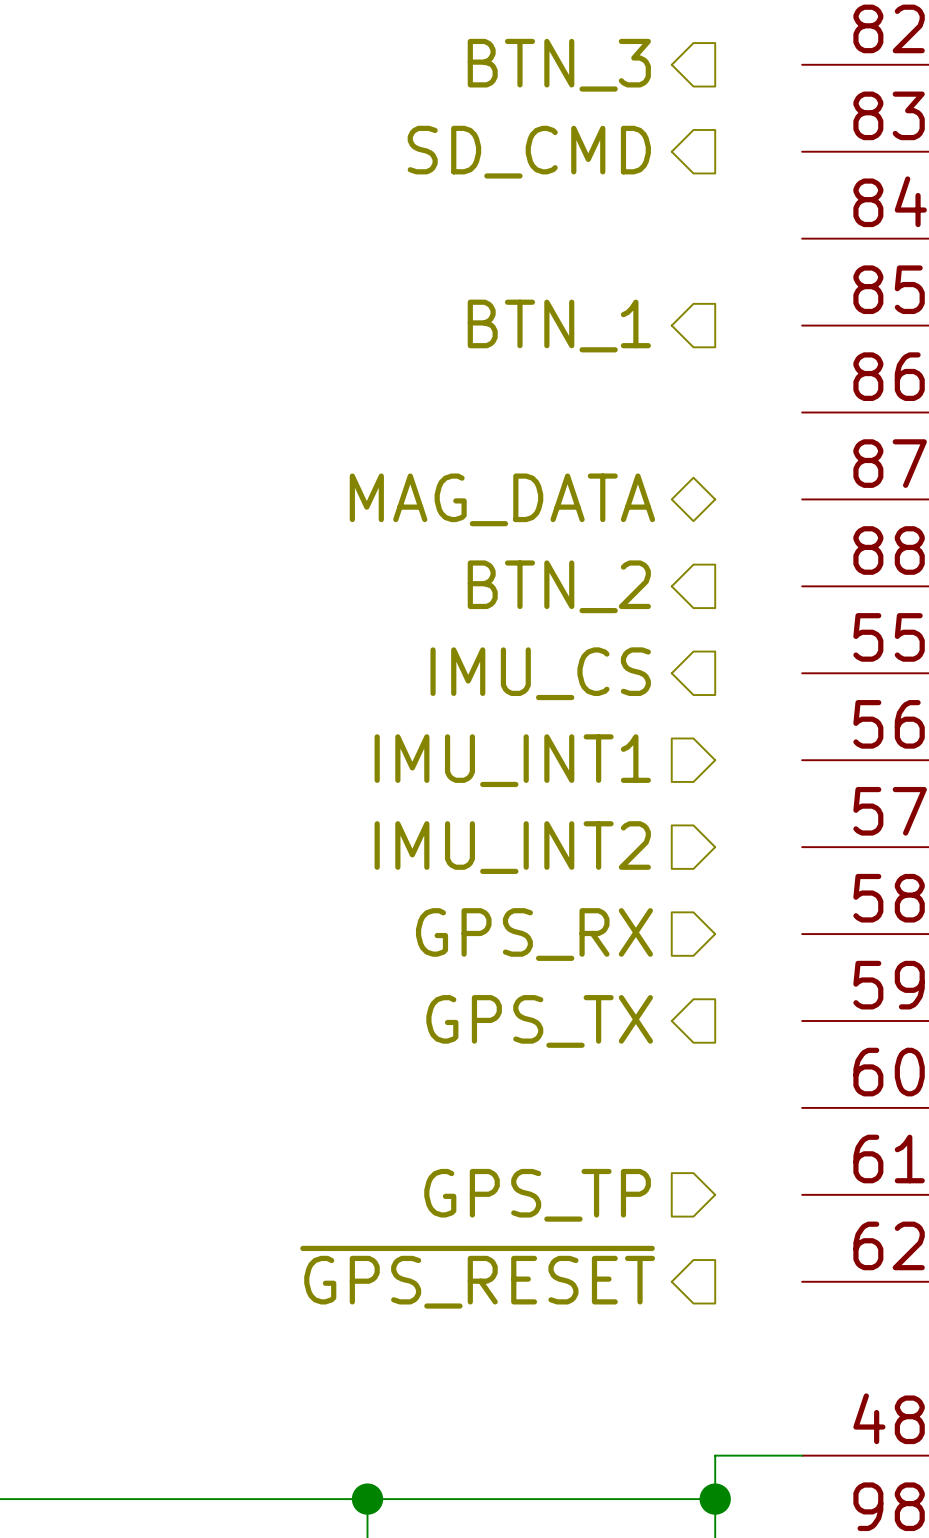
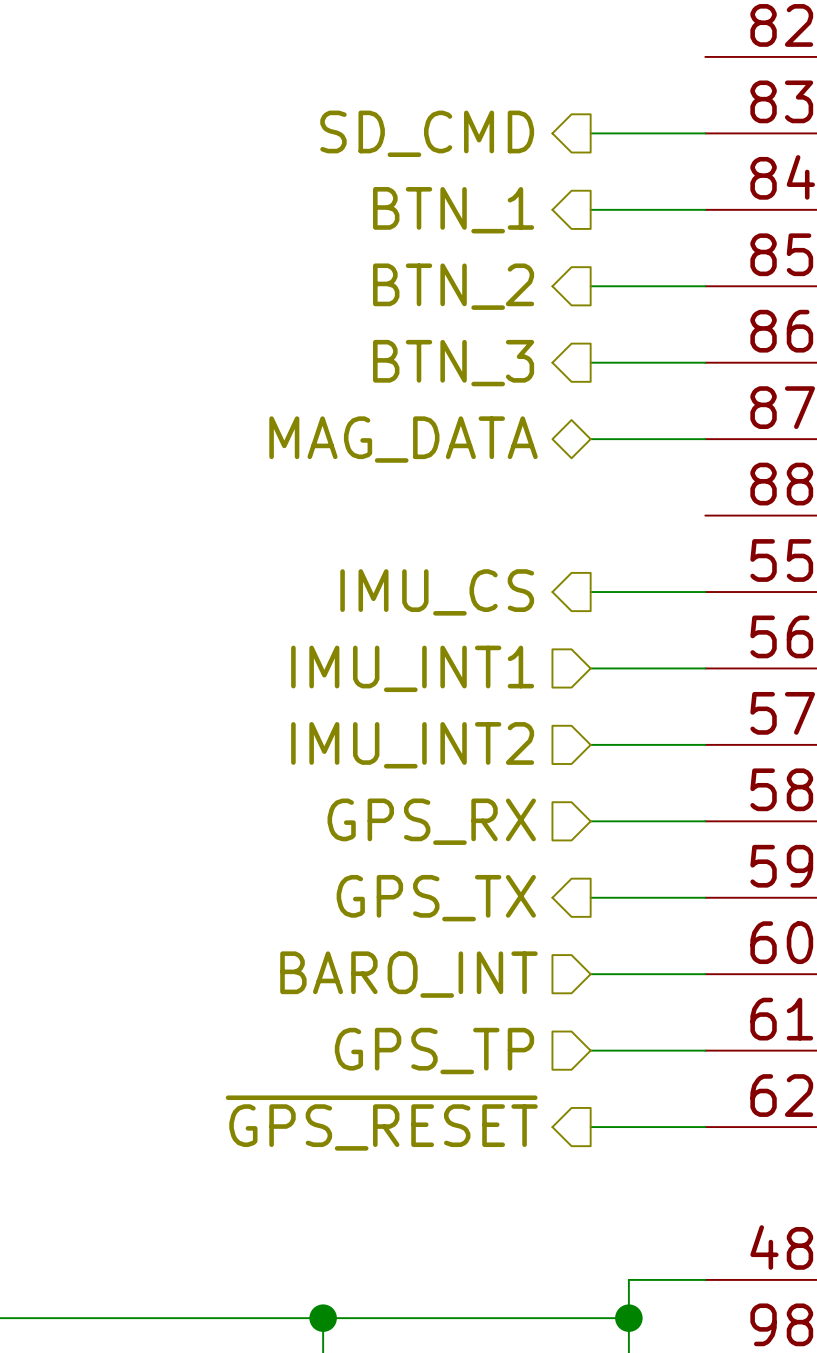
hierarchical label position: BTN_3 (559, 65) -> BTN_3 (453, 363)
wire: none -> (590, 133) (705, 133)
hierarchical label position: SD_CMD (529, 152) -> SD_CMD (427, 133)
wire: none -> (590, 209) (705, 209)
wire: none -> (590, 286) (705, 286)
hierarchical label position: BTN_1 (559, 326) -> BTN_1 (453, 210)
wire: none -> (590, 362) (705, 362)
hierarchical label position: MAG_DATA (502, 499) -> MAG_DATA (403, 439)
wire: none -> (590, 439) (705, 439)
hierarchical label position: BTN_2 (559, 586) -> BTN_2 (453, 286)
hierarchical label position: IMU_CS (540, 673) -> IMU_CS (437, 592)
wire: none -> (590, 592) (705, 592)
hierarchical label position: IMU_INT1 (512, 760) -> IMU_INT1 (412, 668)
wire: none -> (590, 668) (705, 668)
hierarchical label position: IMU_INT2 (512, 847) -> IMU_INT2 (412, 745)
wire: none -> (590, 744) (705, 744)
hierarchical label position: GPS_RX (534, 934) -> GPS_RX (431, 821)
wire: none -> (590, 821) (705, 821)
hierarchical label position: GPS_TX (539, 1021) -> GPS_TX (436, 898)
wire: none -> (590, 897) (705, 897)
wire: none -> (590, 974) (705, 974)
hierarchical label: none -> BARO_INT (408, 974)
wire: none -> (590, 1050) (705, 1050)
hierarchical label position: GPS_TP (537, 1195) -> GPS_TP (434, 1051)
hierarchical label position: ~{GPS_RESET} (477, 1277) -> ~{GPS_RESET} (381, 1123)
wire: none -> (590, 1127) (705, 1127)

